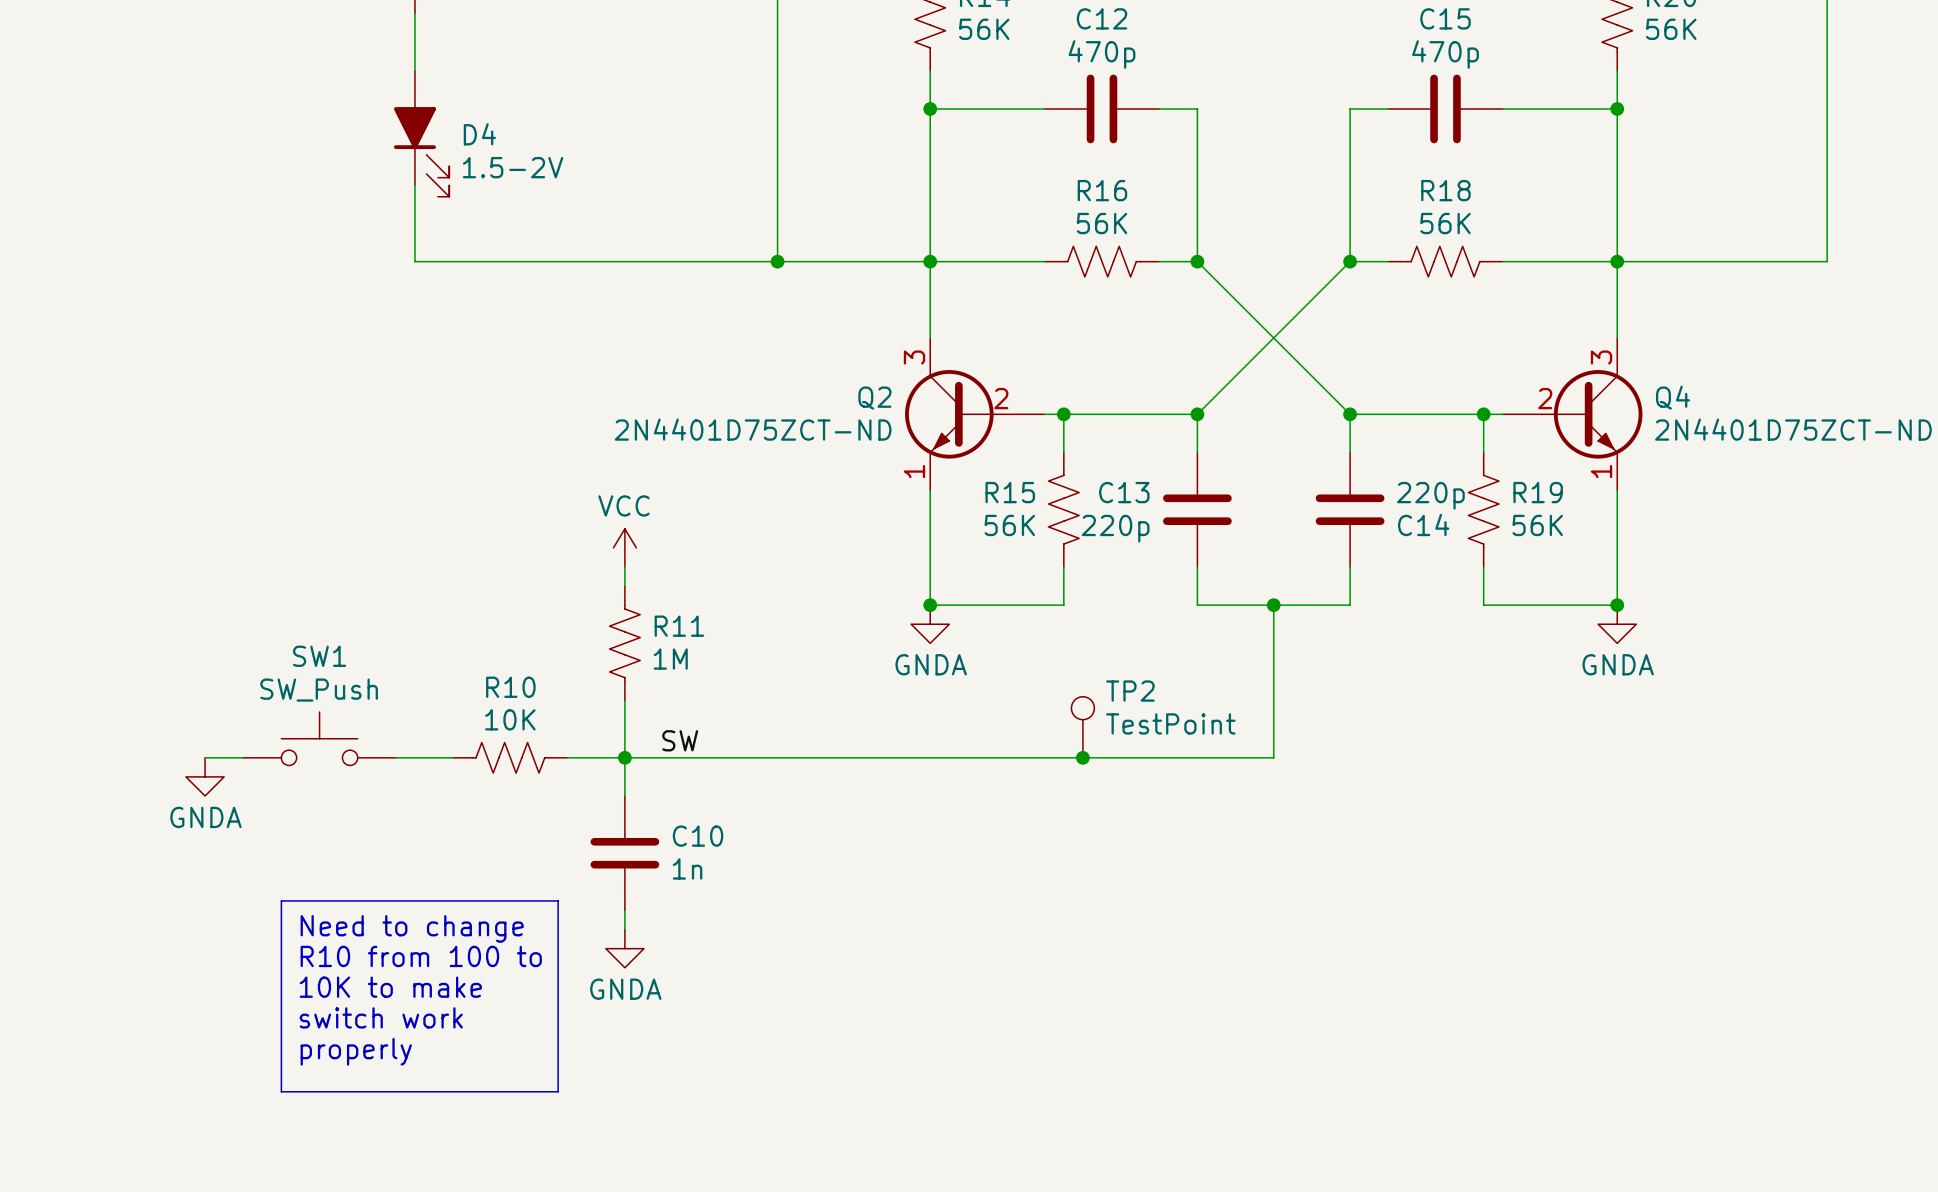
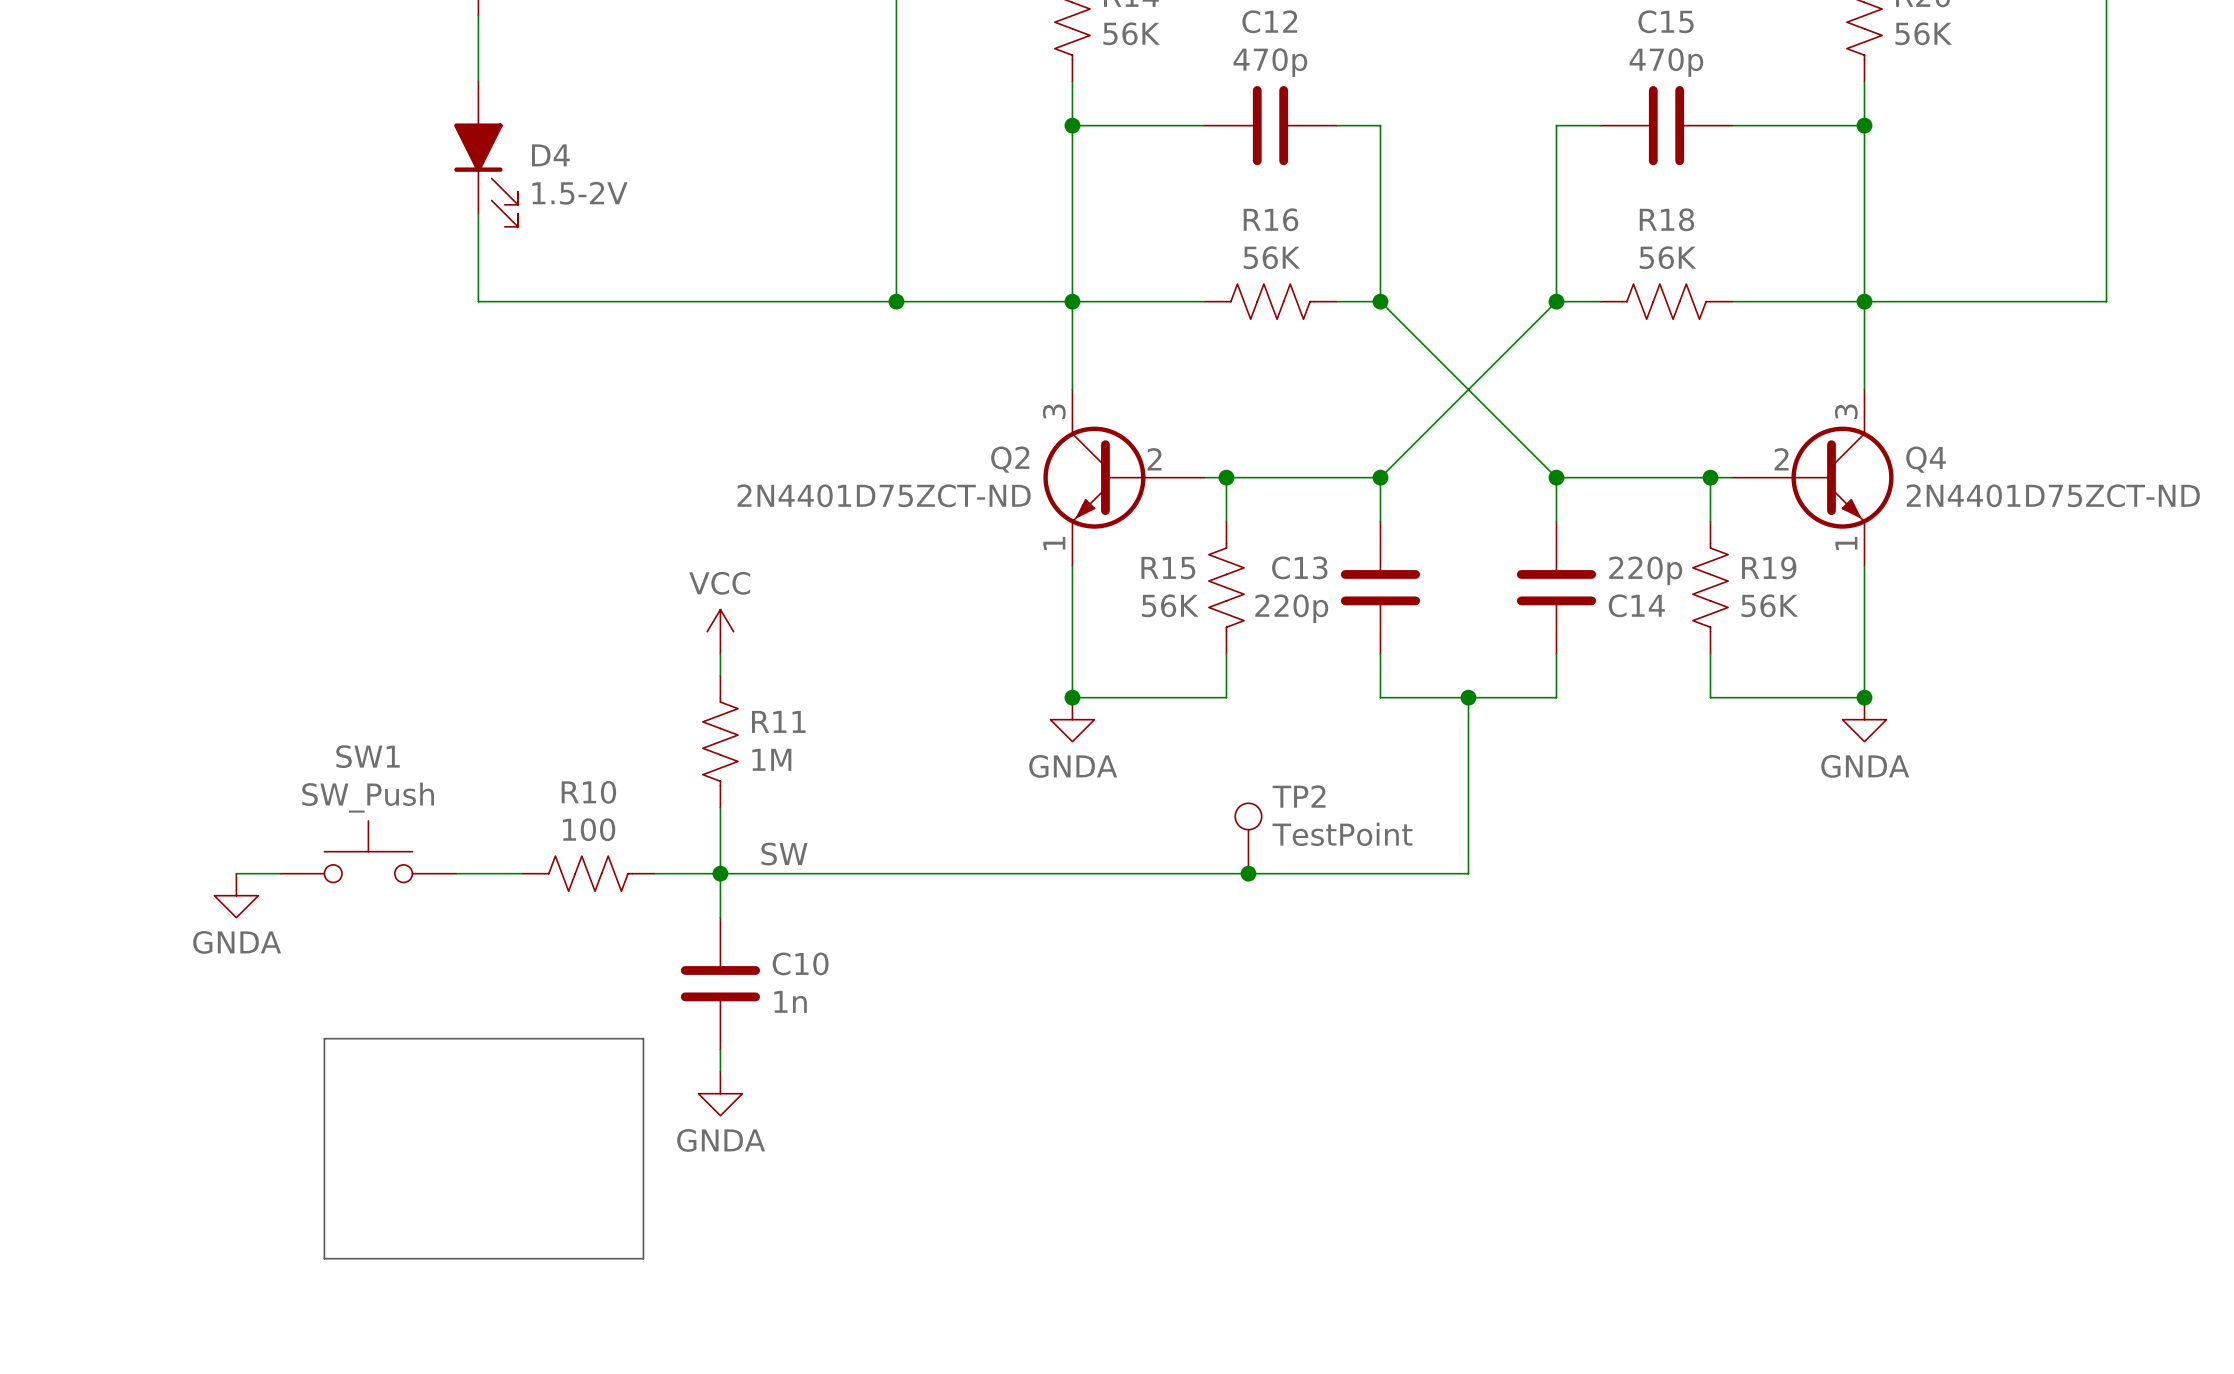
R10 value: 10K (510, 719) -> 100 (589, 829)
text: Need to change (412, 928) -> none
text: R10 from 100 to (421, 956) -> none
text: 10K to make (390, 987) -> none
text: switch work (381, 1017) -> none
text: properly (356, 1051) -> none

